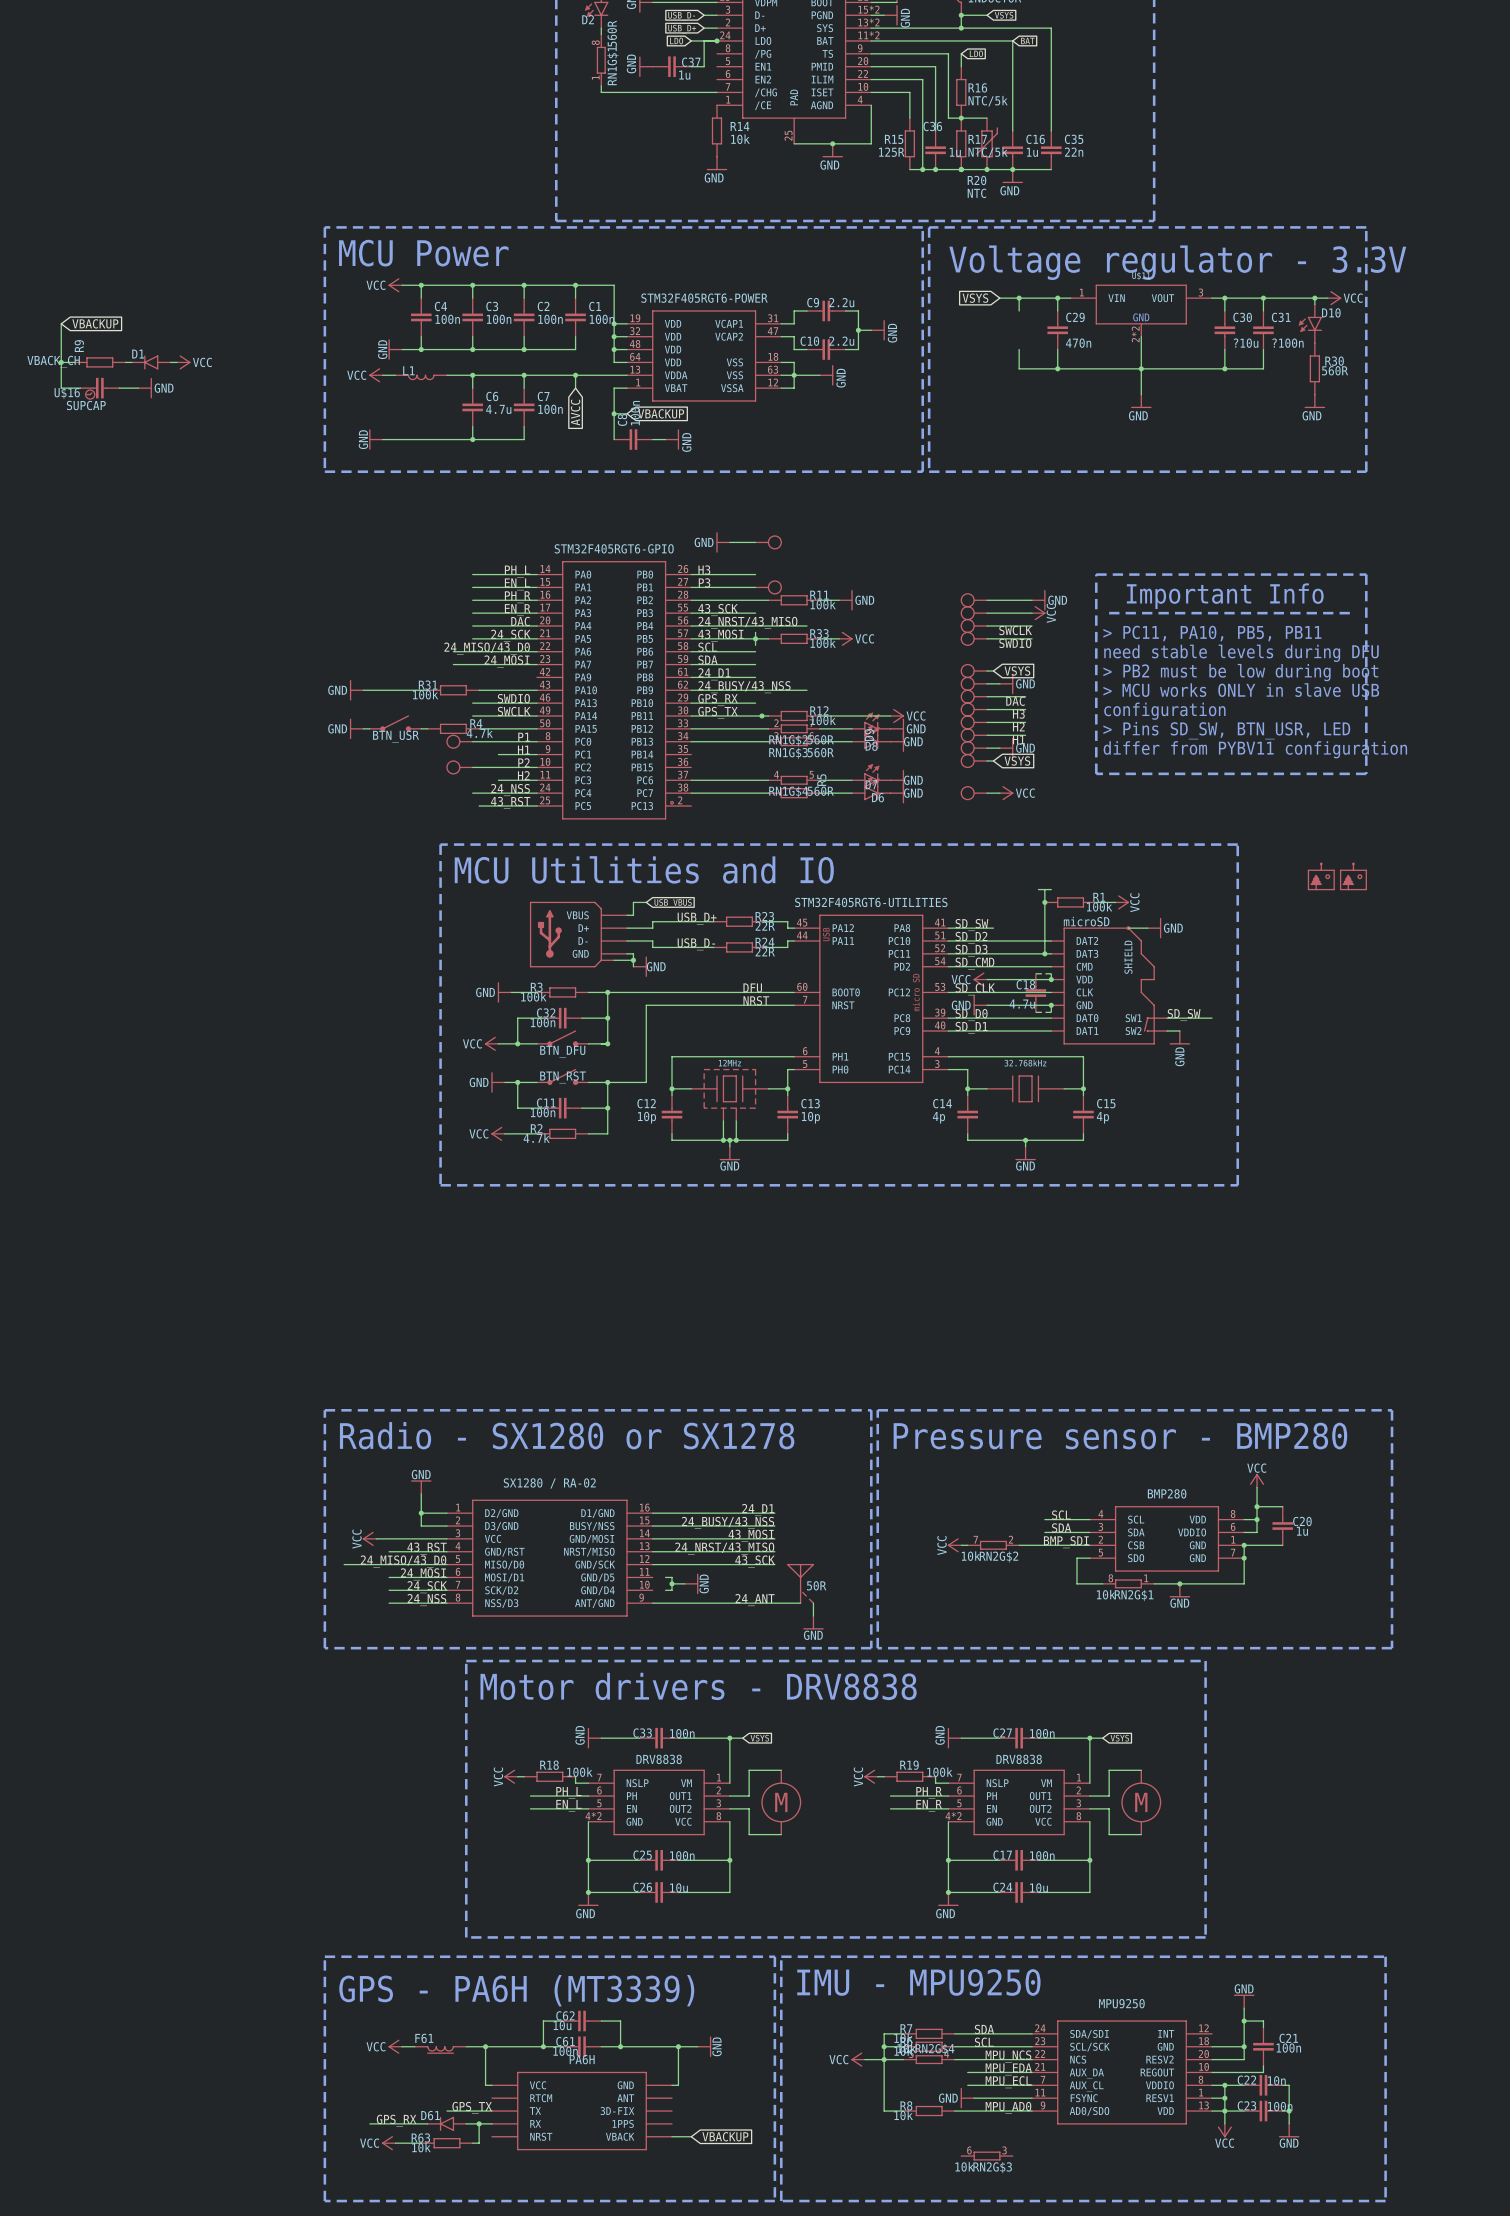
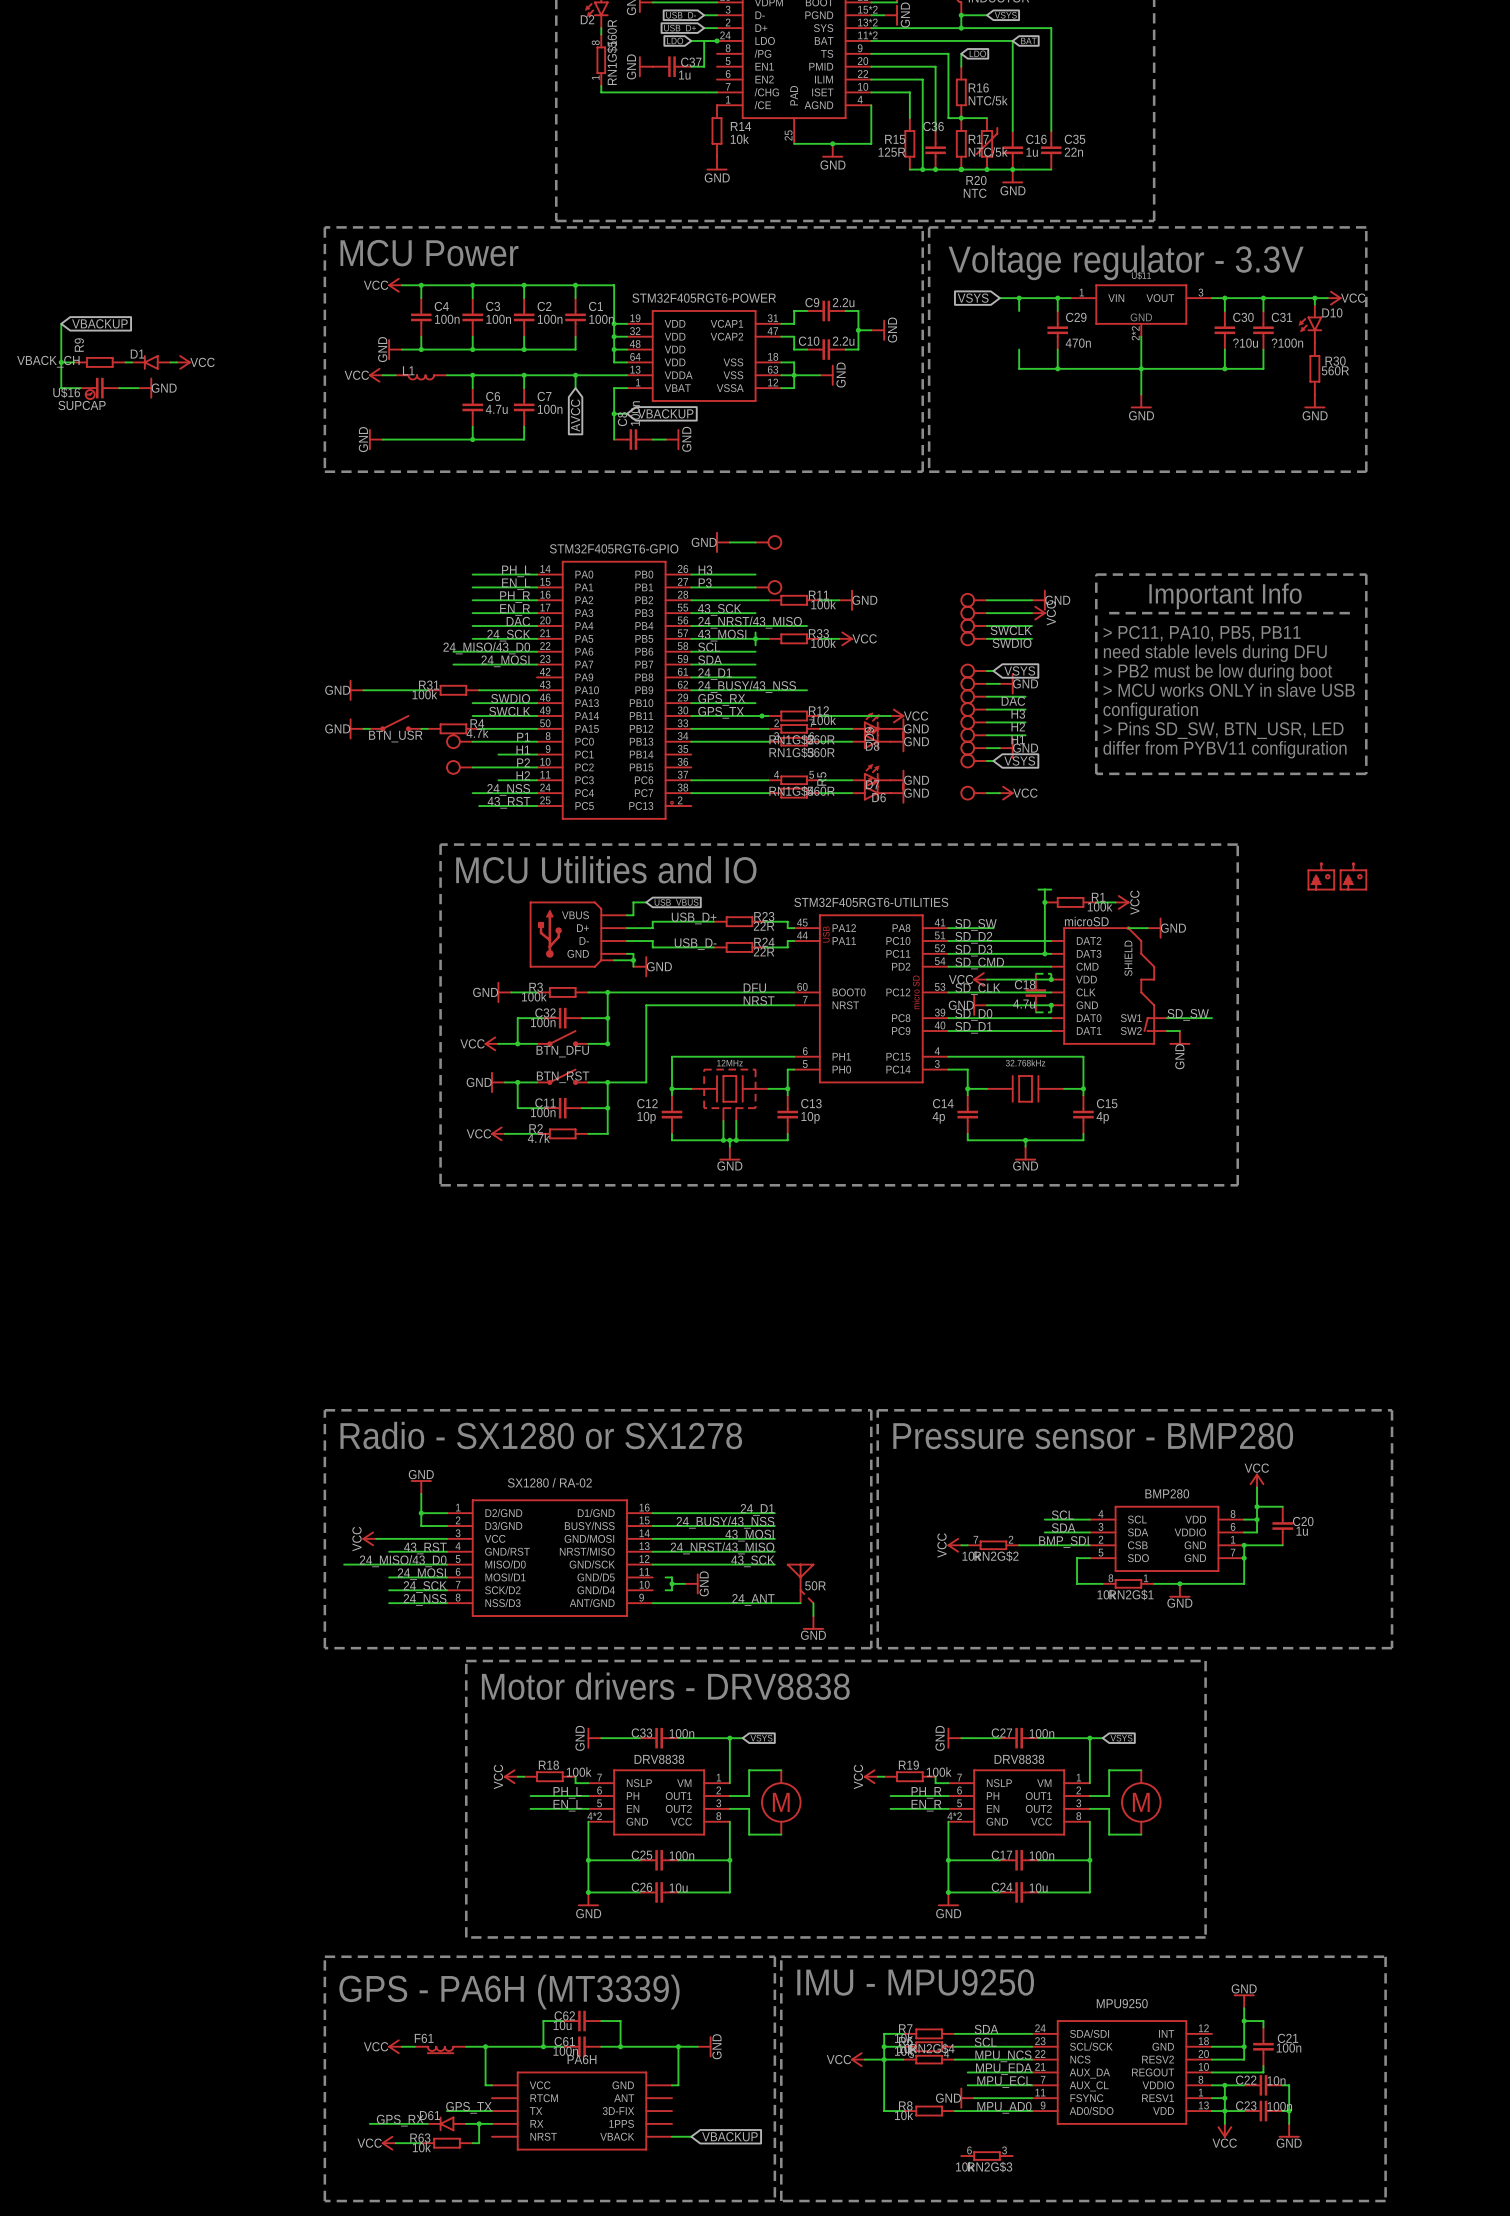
C36 value: 1u (955, 152) -> none

